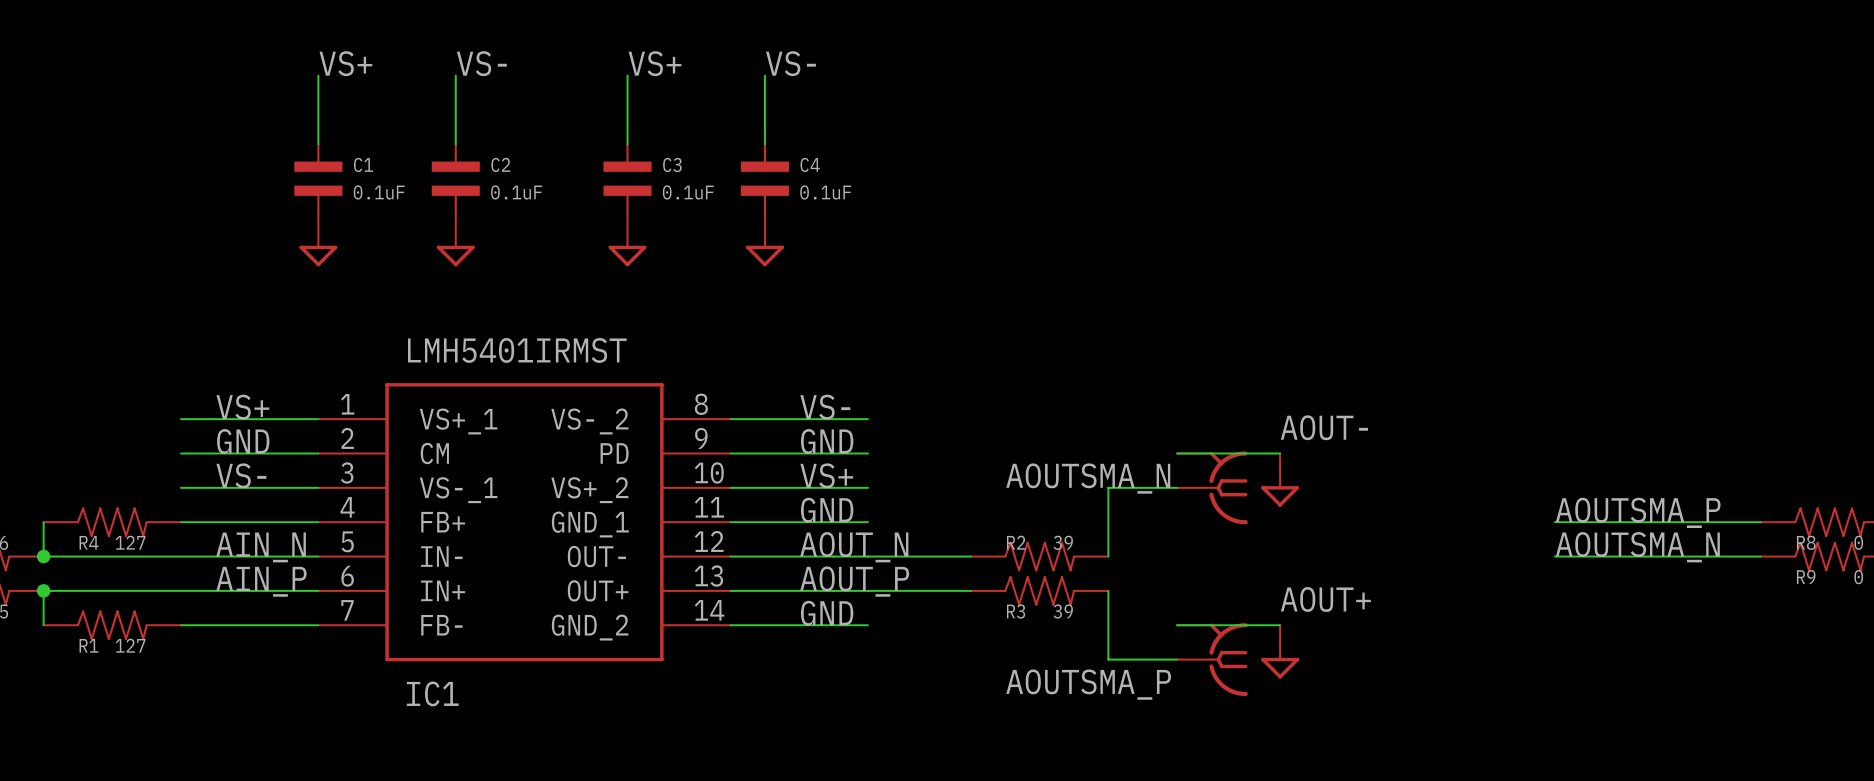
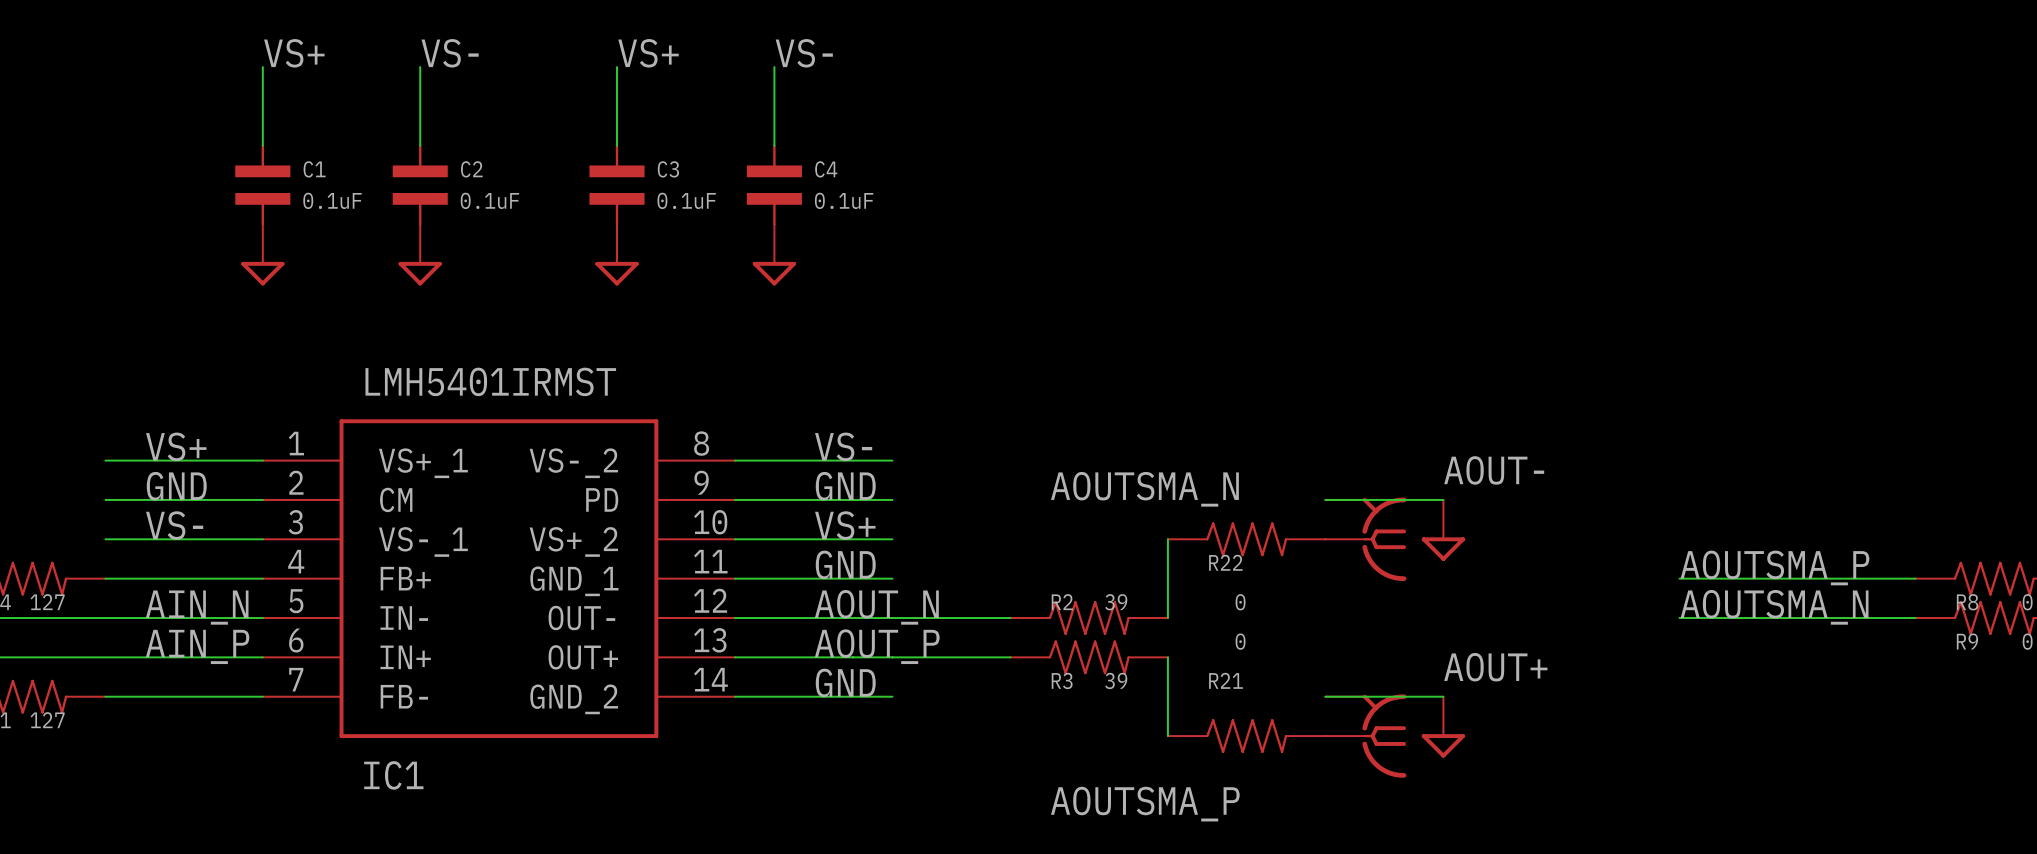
wire: (1177, 453) (1245, 453) -> (1364, 499) (1443, 499)
label position: AOUTSMA_N (1088, 478) -> AOUTSMA_N (1144, 489)
power symbol position: (1280, 480) -> (1443, 530)
R22: none -> 0 (1246, 539)
AOUT- position: (1212, 487) -> (1365, 539)
wire: (1177, 625) (1245, 625) -> (1364, 696) (1443, 696)
power symbol position: (1280, 651) -> (1443, 727)
R21: none -> 0 (1246, 736)
AOUT+ position: (1212, 659) -> (1365, 736)
label position: AOUTSMA_P (1088, 684) -> AOUTSMA_P (1145, 804)

